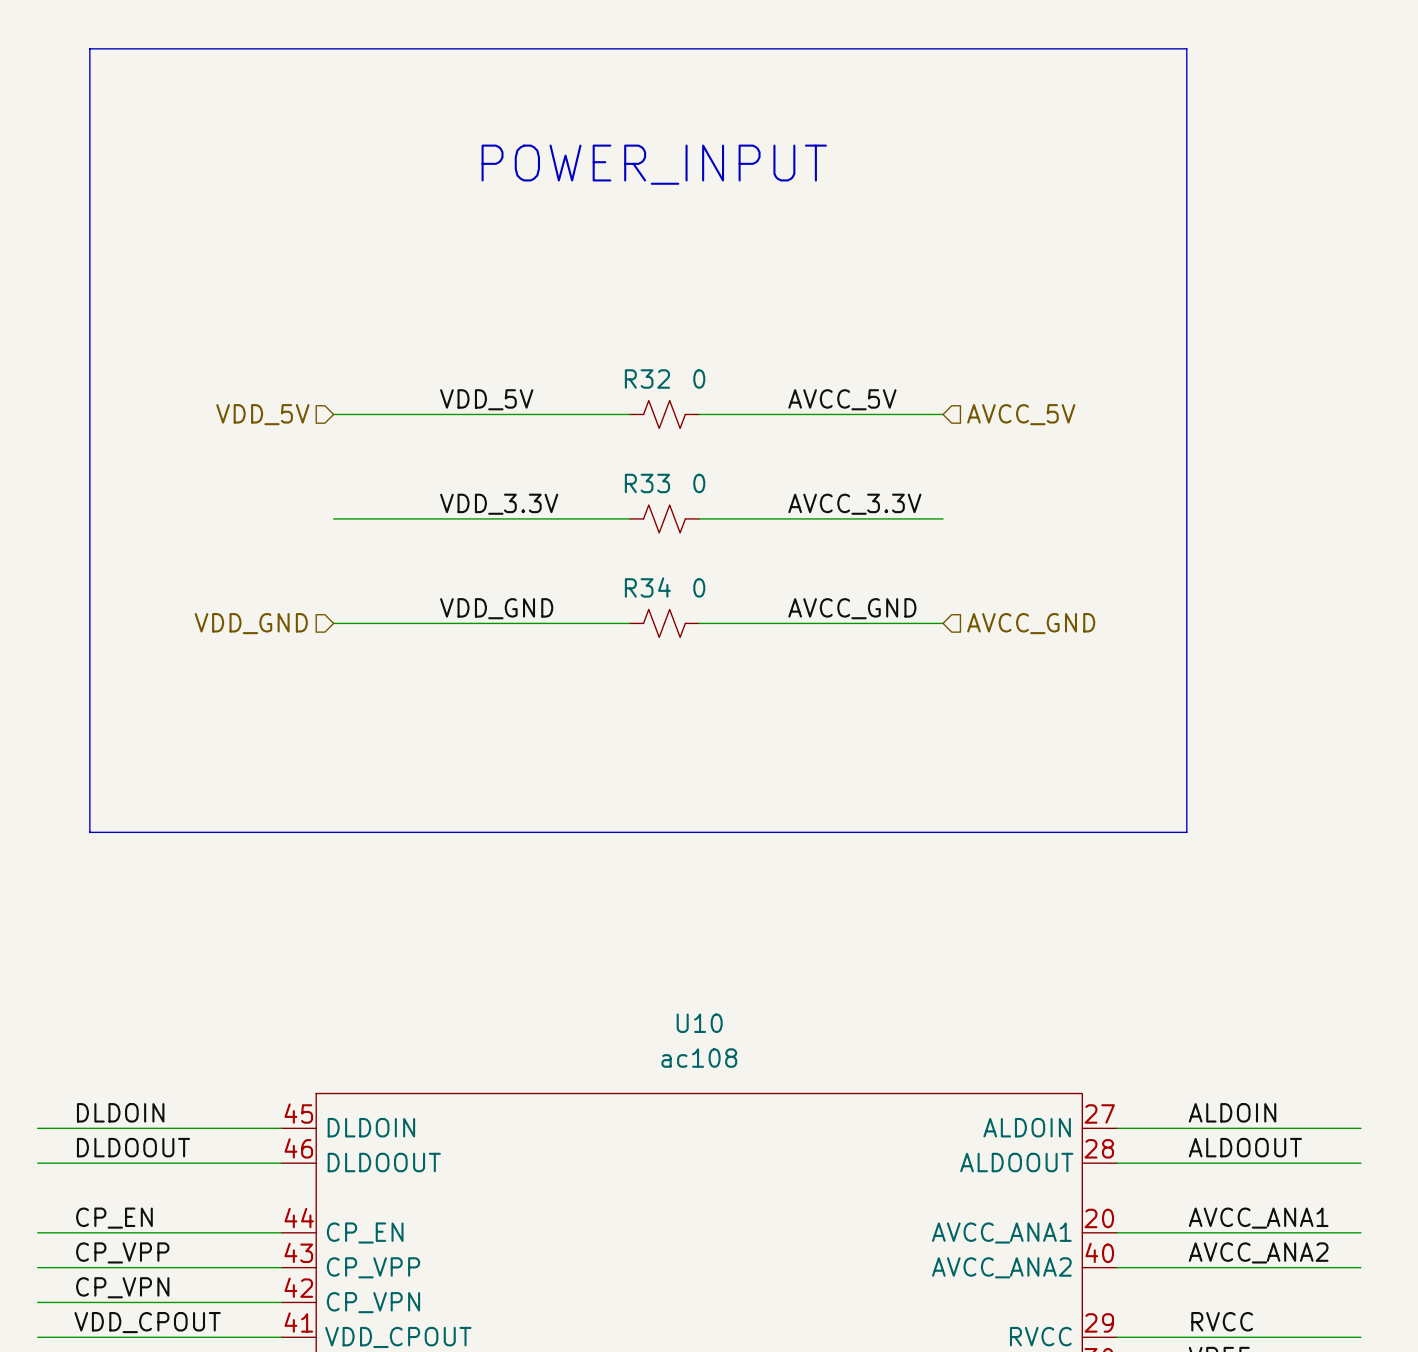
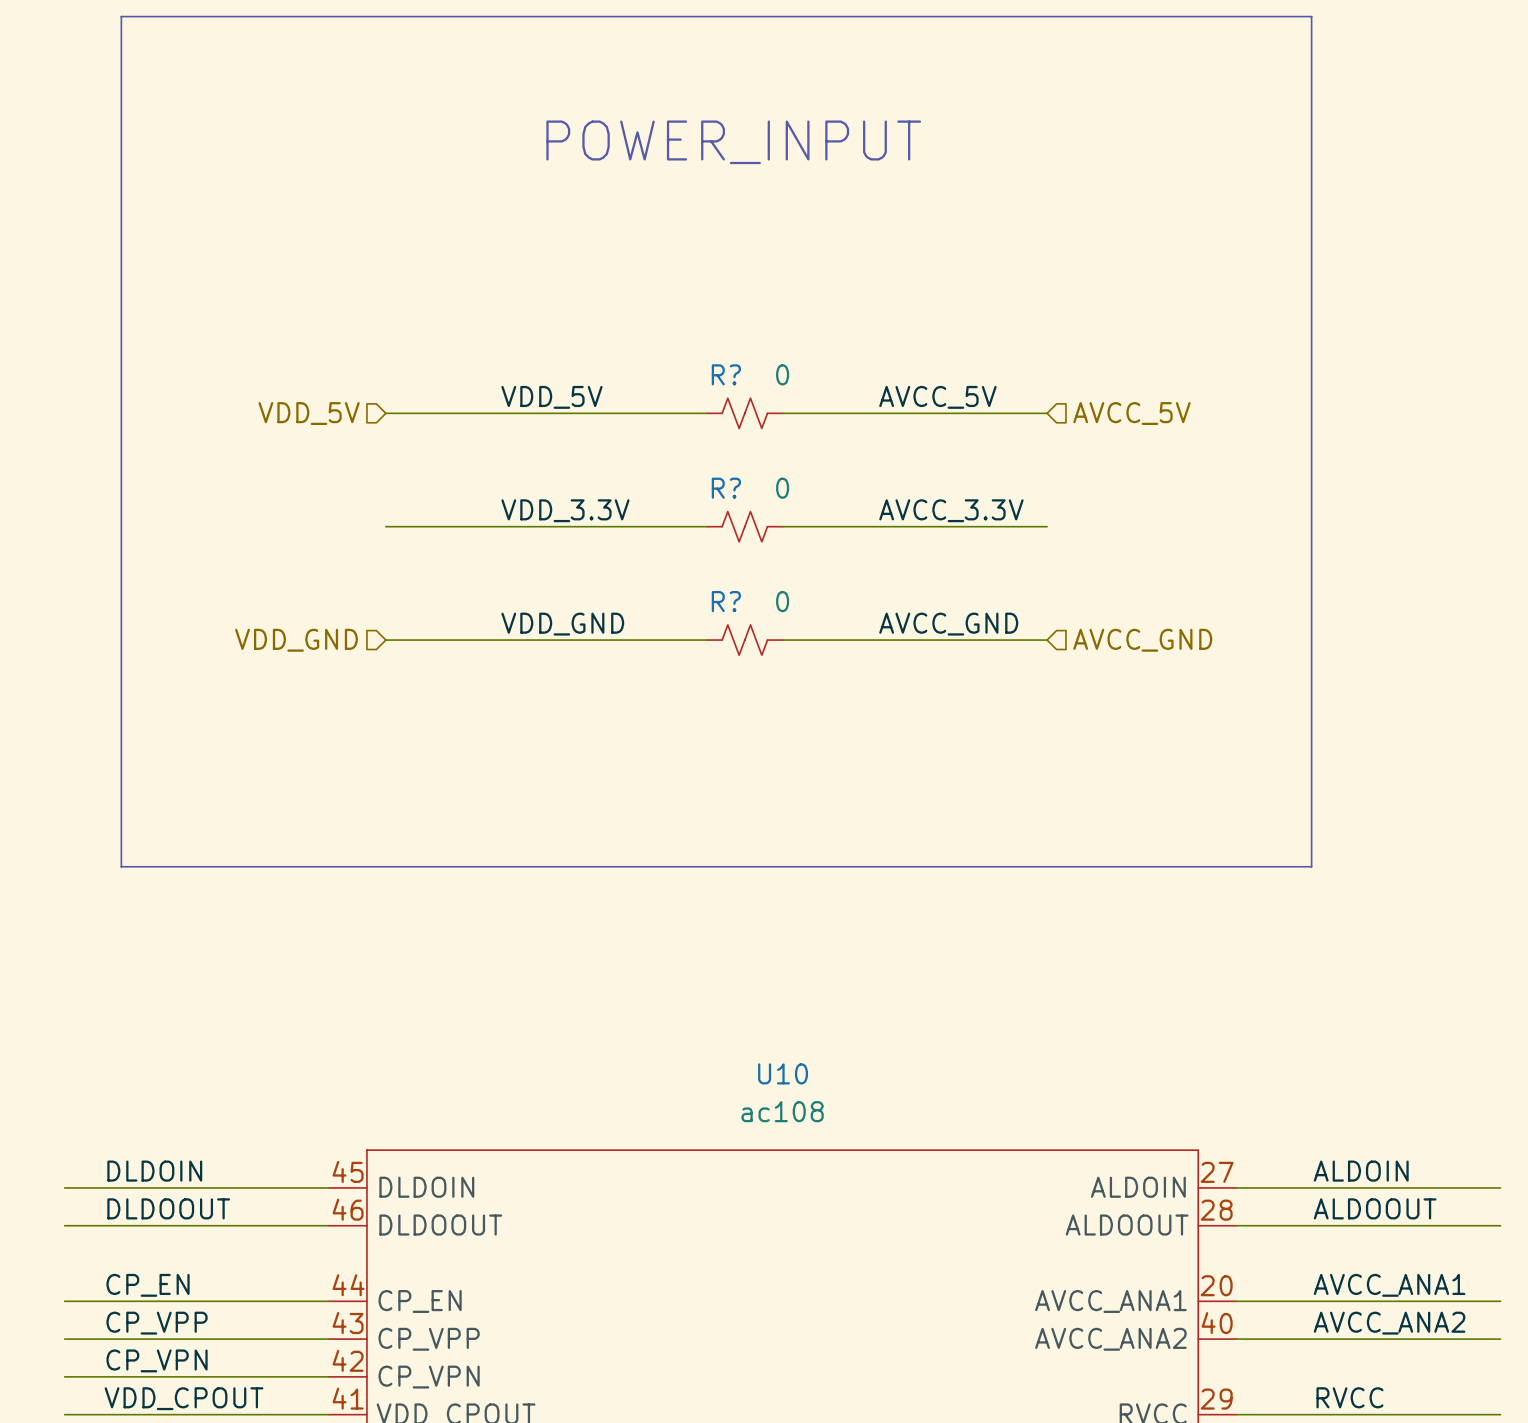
R32 name: R32 (647, 379) -> R? (726, 374)
R33 name: R33 (647, 483) -> R? (726, 488)
R34 name: R34 (647, 587) -> R? (726, 601)

